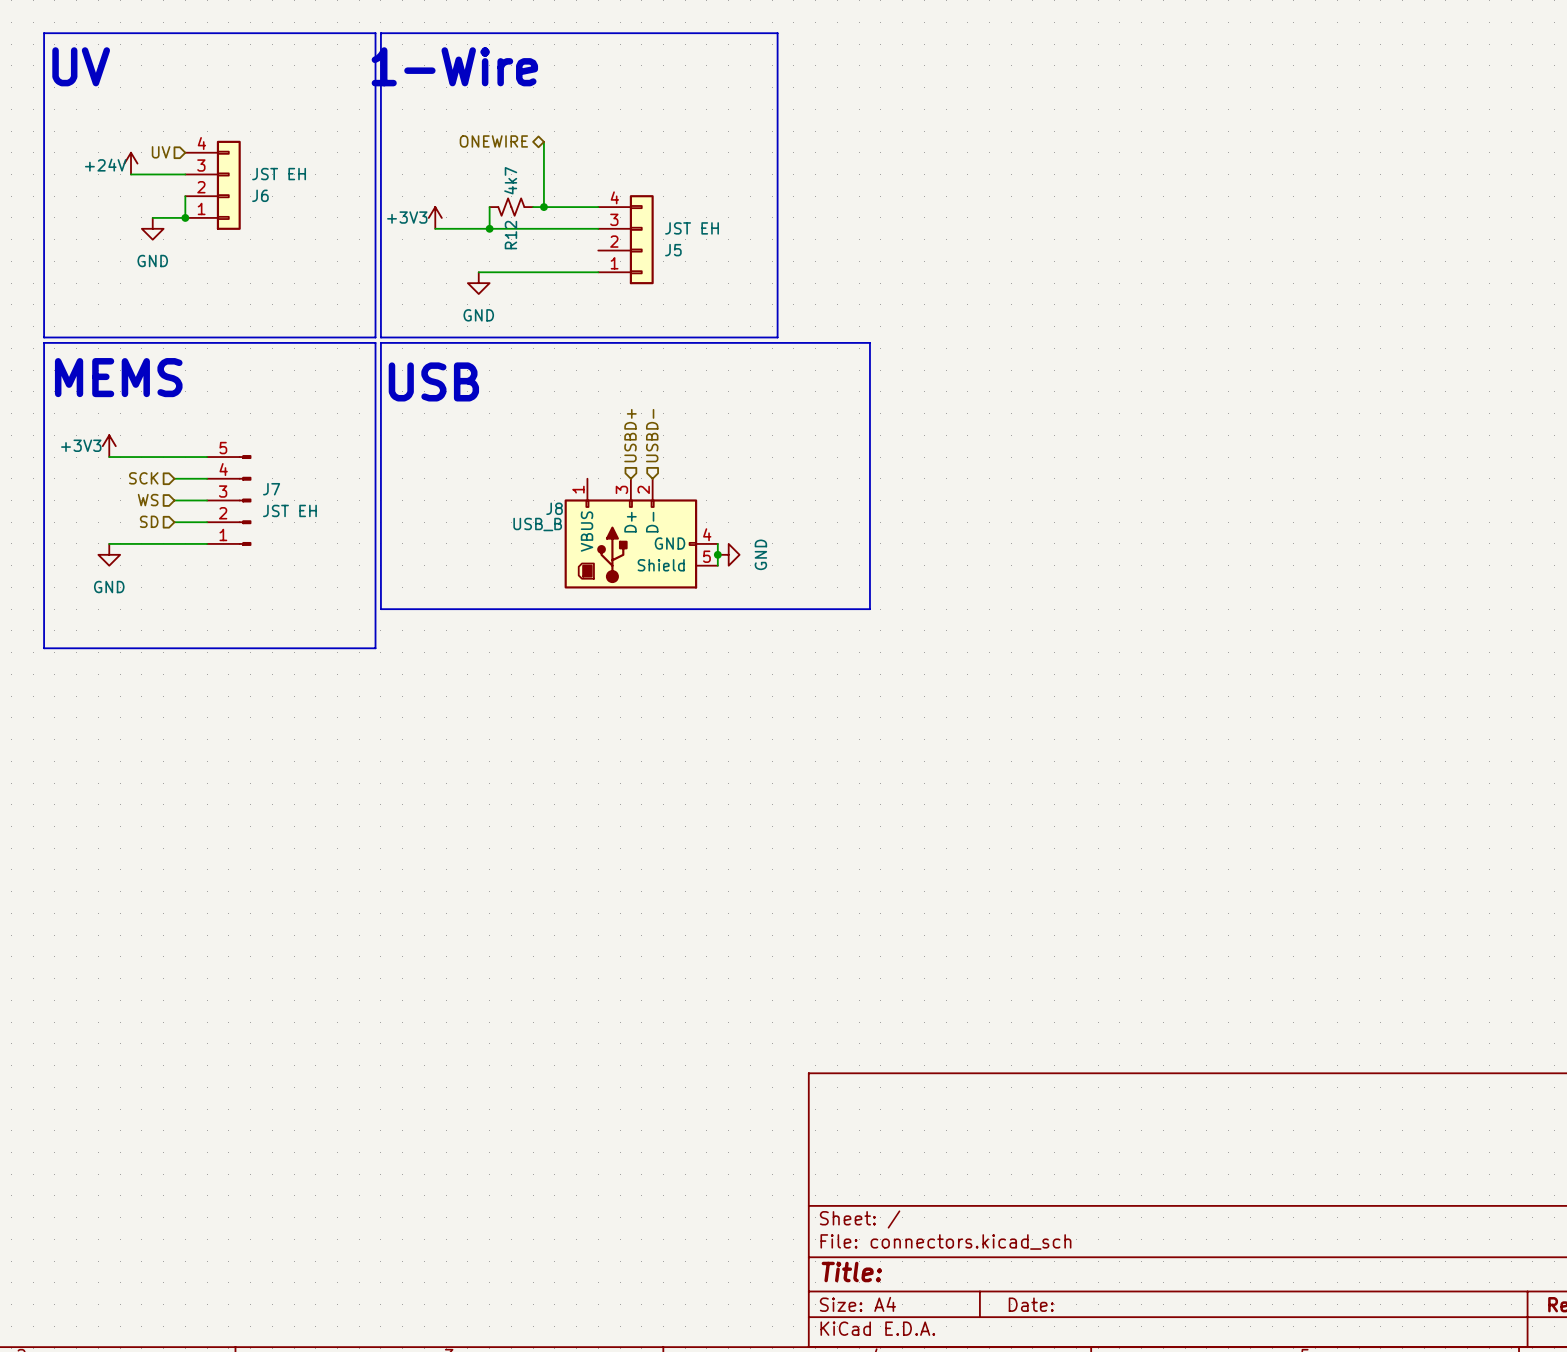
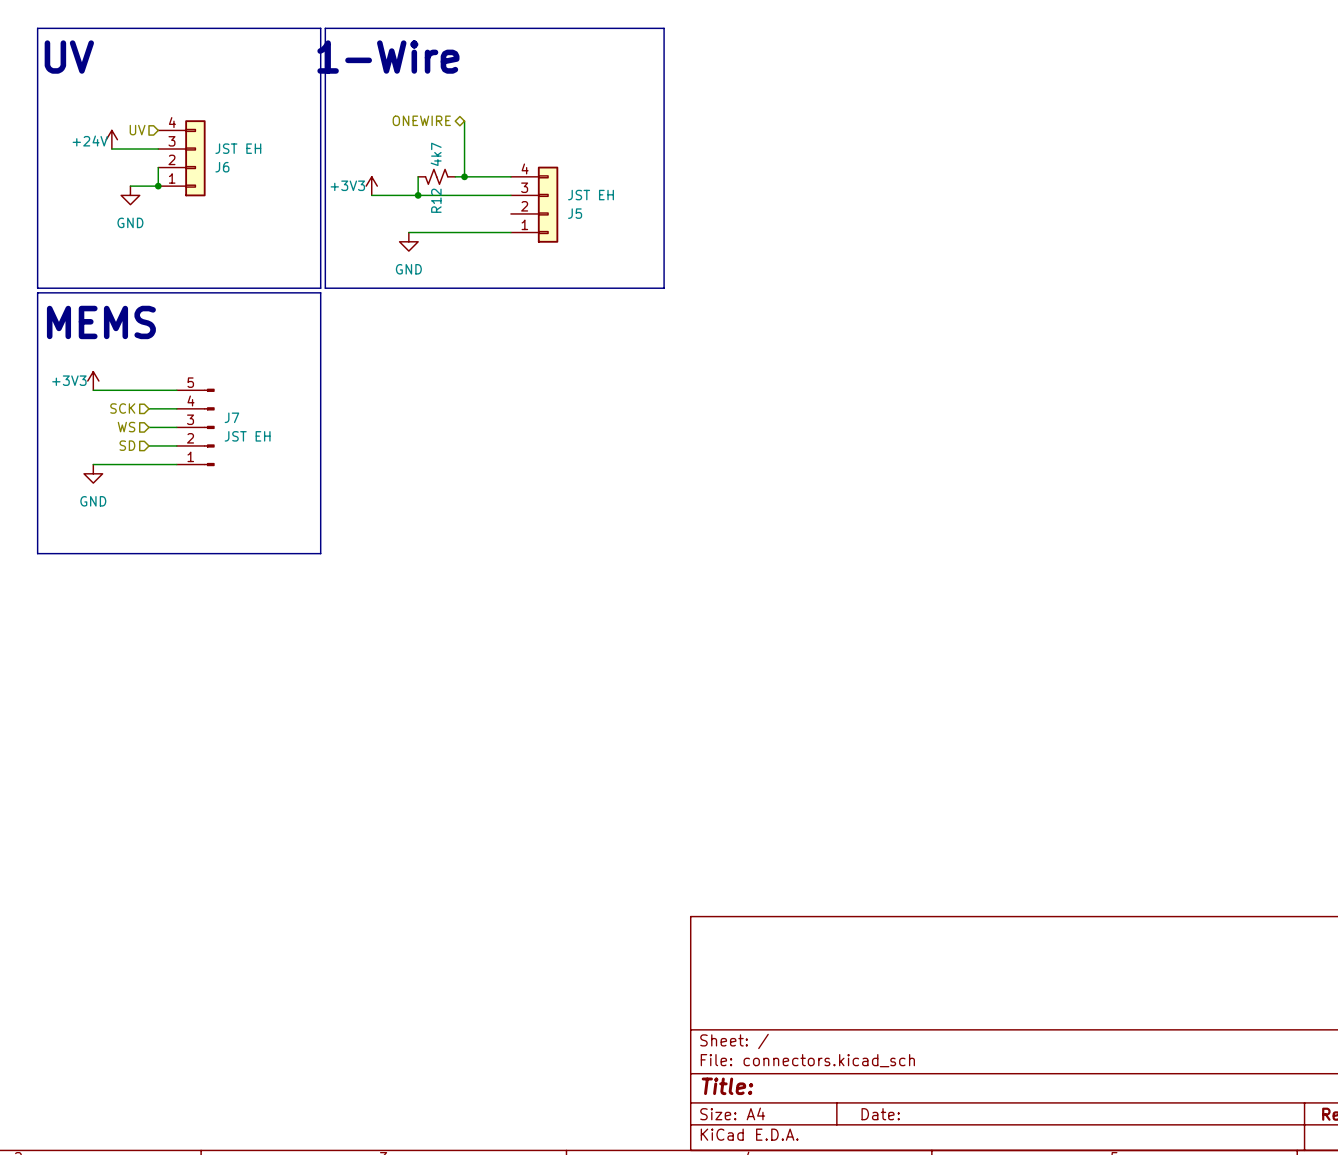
line: (380, 342) (869, 342) (869, 609) (380, 609) (380, 342) -> none
text: USB (433, 381) -> none
hierarchical label: USBD+ (630, 435) -> none
hierarchical label: USBD- (652, 435) -> none
J8: USB_B (641, 533) -> none
wire: (717, 543) (717, 565) -> none
junction: (717, 554) -> none
power symbol: GND (728, 554) -> none

